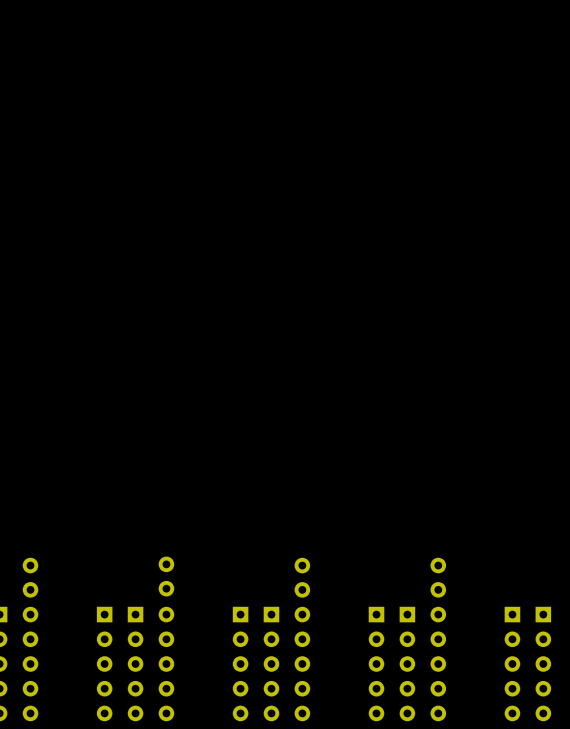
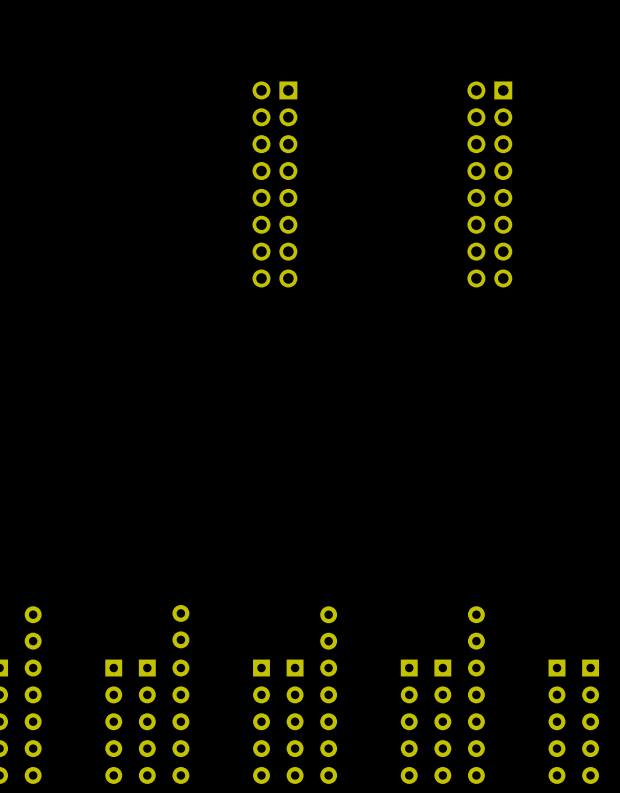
part: none -> (274, 184)
part: none -> (489, 184)

